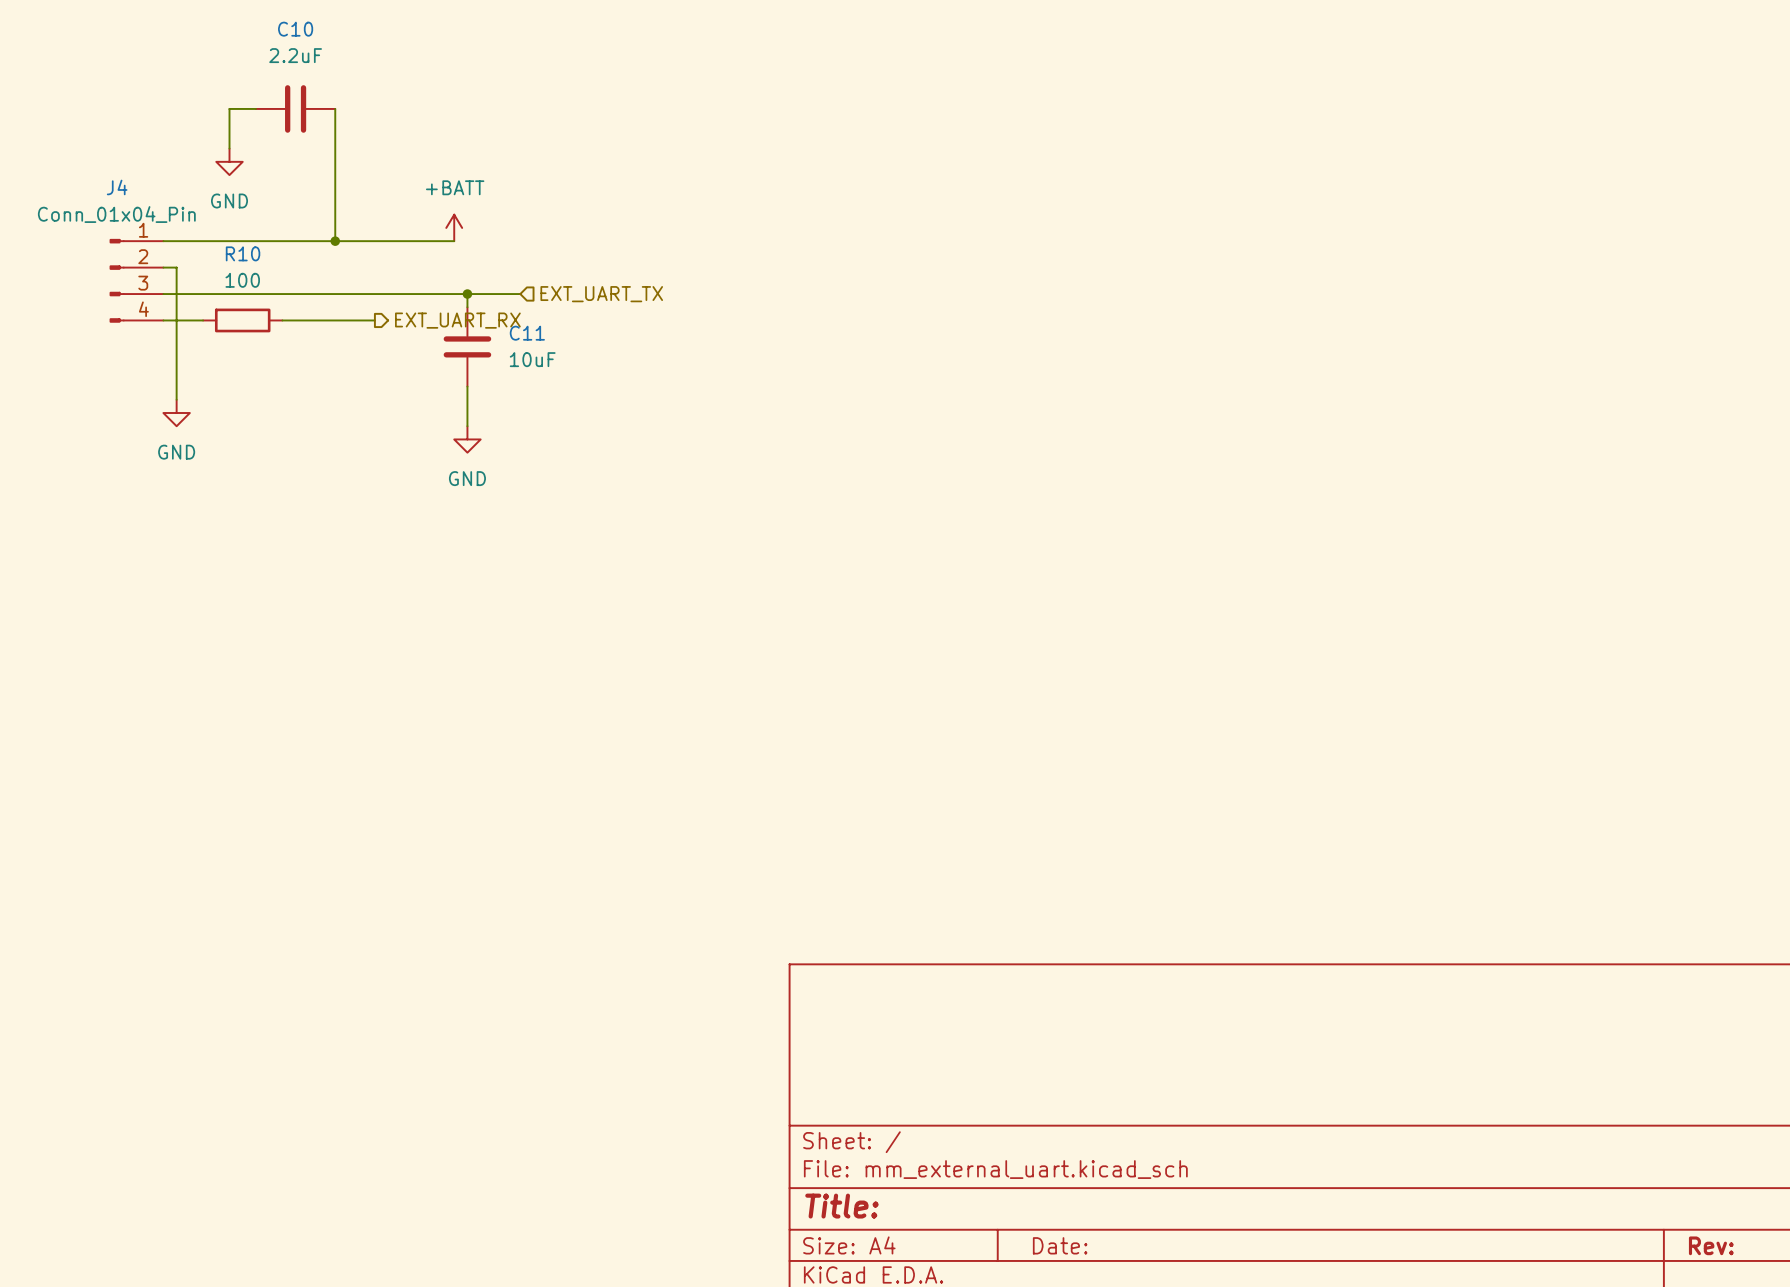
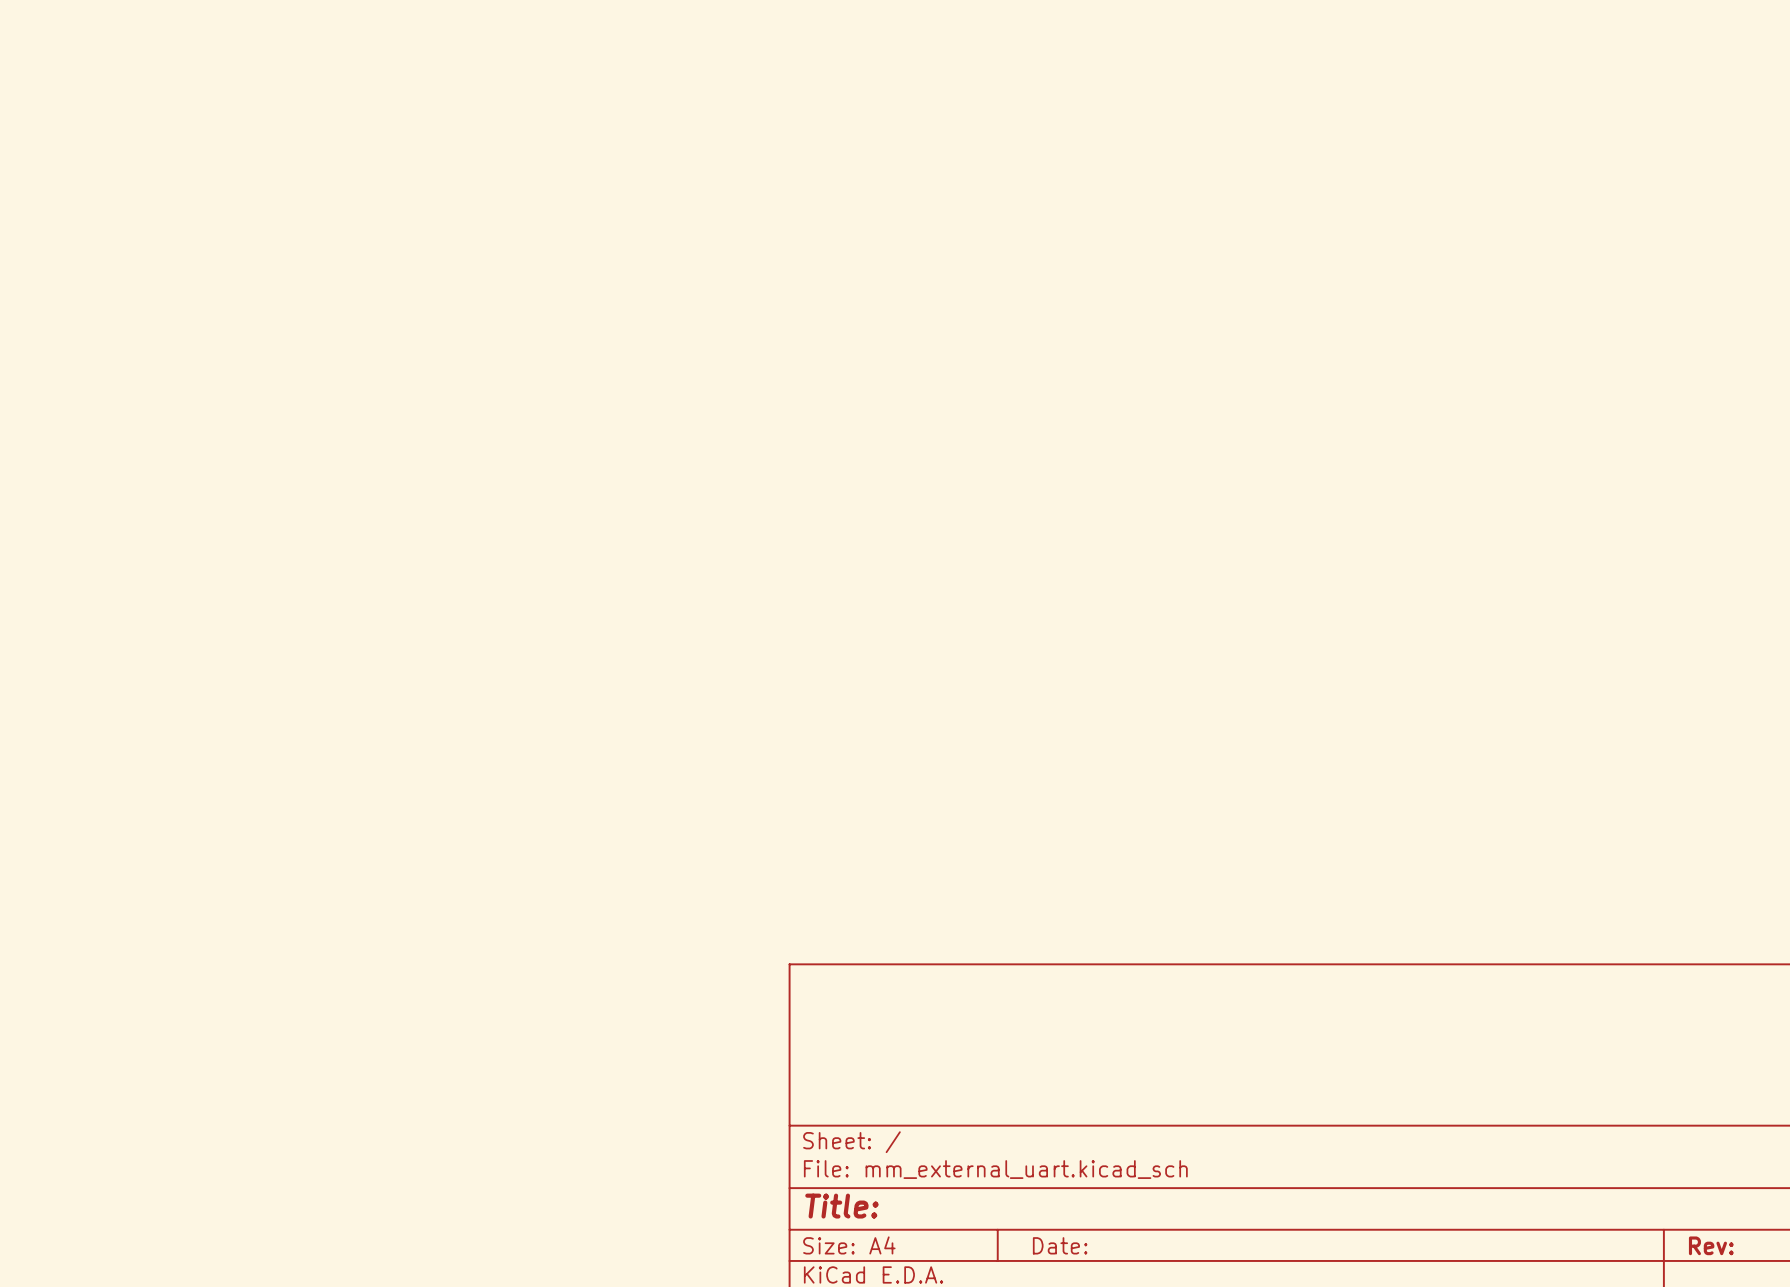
wire: (255, 108) (229, 108) (229, 148) -> none
C10: 2.2uF (295, 108) -> none
wire: (335, 108) (335, 241) -> none
power symbol: GND (229, 161) -> none
power symbol: +BATT (454, 227) -> none
wire: (163, 241) (454, 241) -> none
junction: (335, 241) -> none
wire: (163, 267) (176, 267) (176, 399) -> none
J4: Conn_01x04_Pin (136, 280) -> none
wire: (163, 294) (520, 294) -> none
wire: (467, 294) (467, 307) -> none
junction: (467, 294) -> none
hierarchical label: EXT_UART_TX (601, 294) -> none
wire: (163, 320) (203, 320) -> none
R10: 100 (242, 320) -> none
wire: (282, 320) (374, 320) -> none
hierarchical label: EXT_UART_RX (457, 320) -> none
C11: 10uF (467, 346) -> none
wire: (467, 386) (467, 426) -> none
power symbol: GND (176, 413) -> none
power symbol: GND (467, 439) -> none

